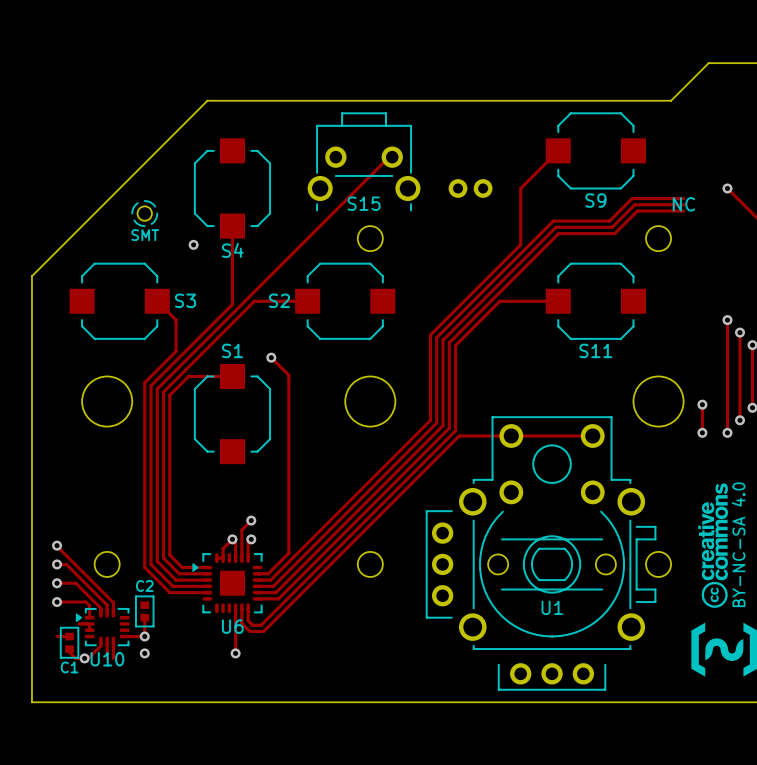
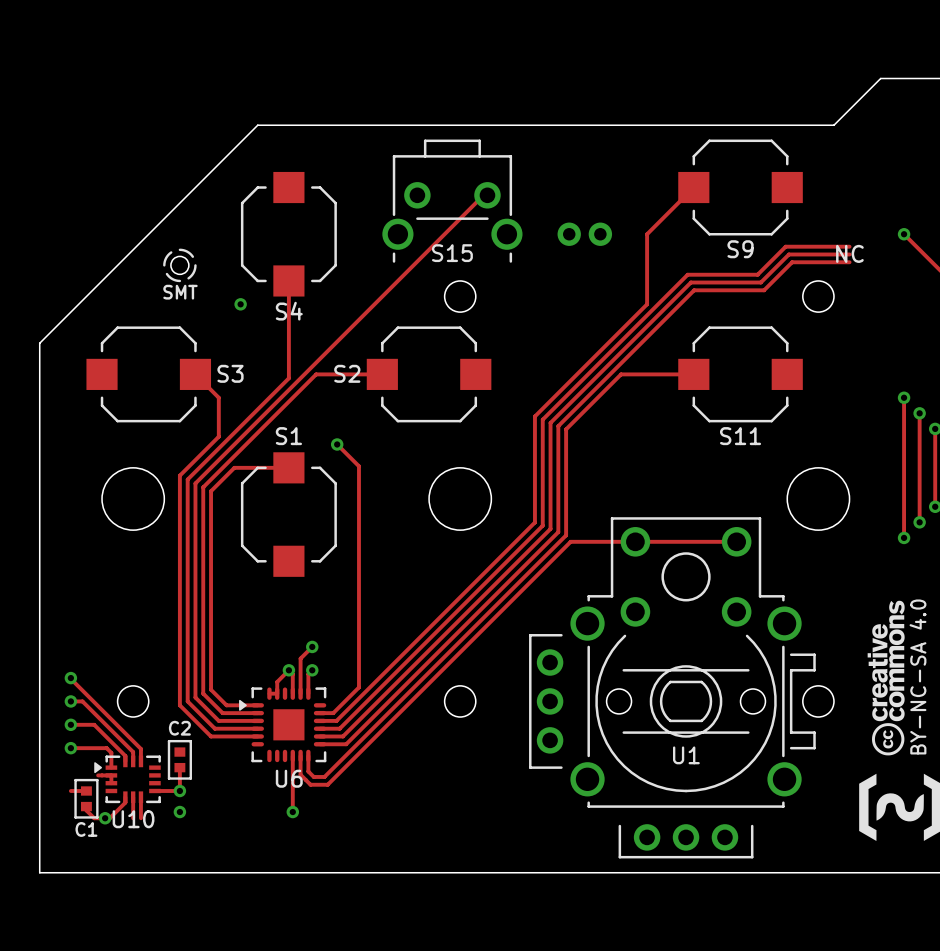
track: (702, 404) (702, 432) -> none
via: (702, 404) -> none
via: (702, 432) -> none

